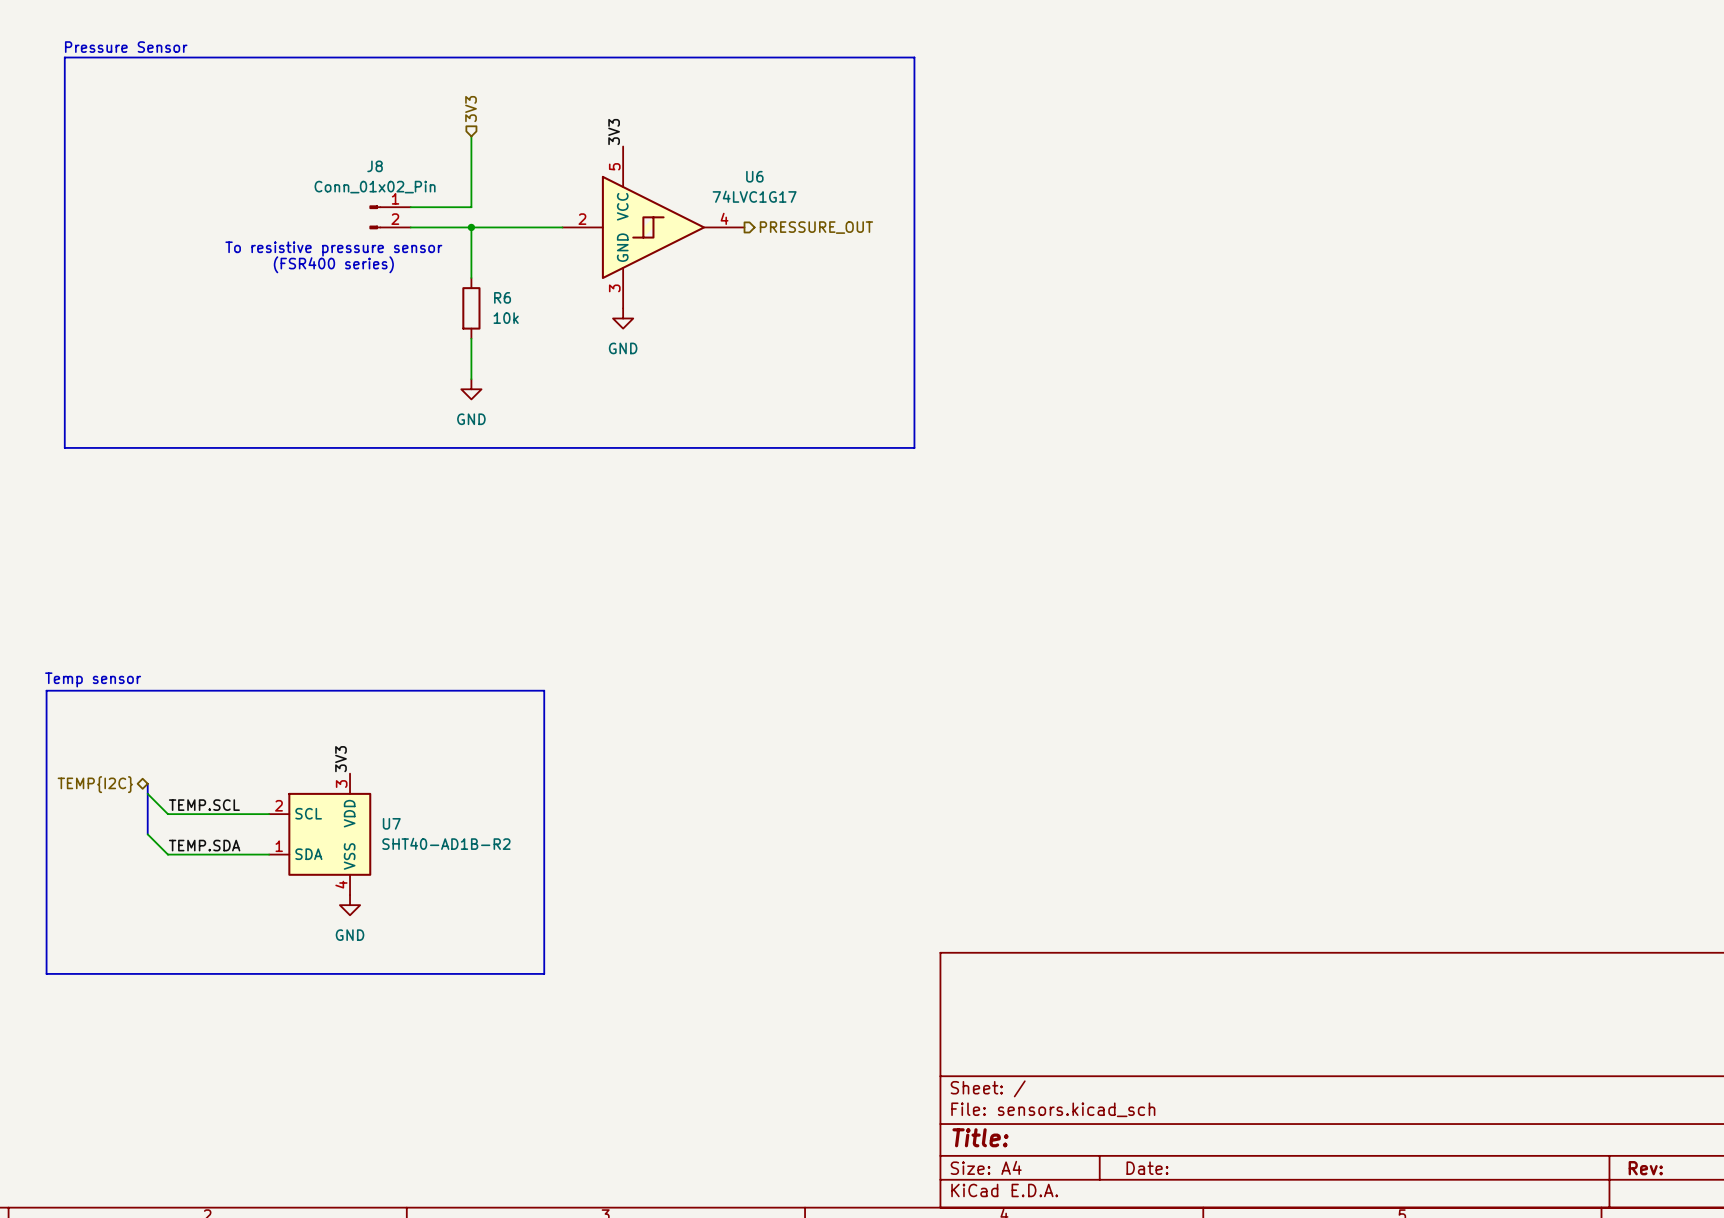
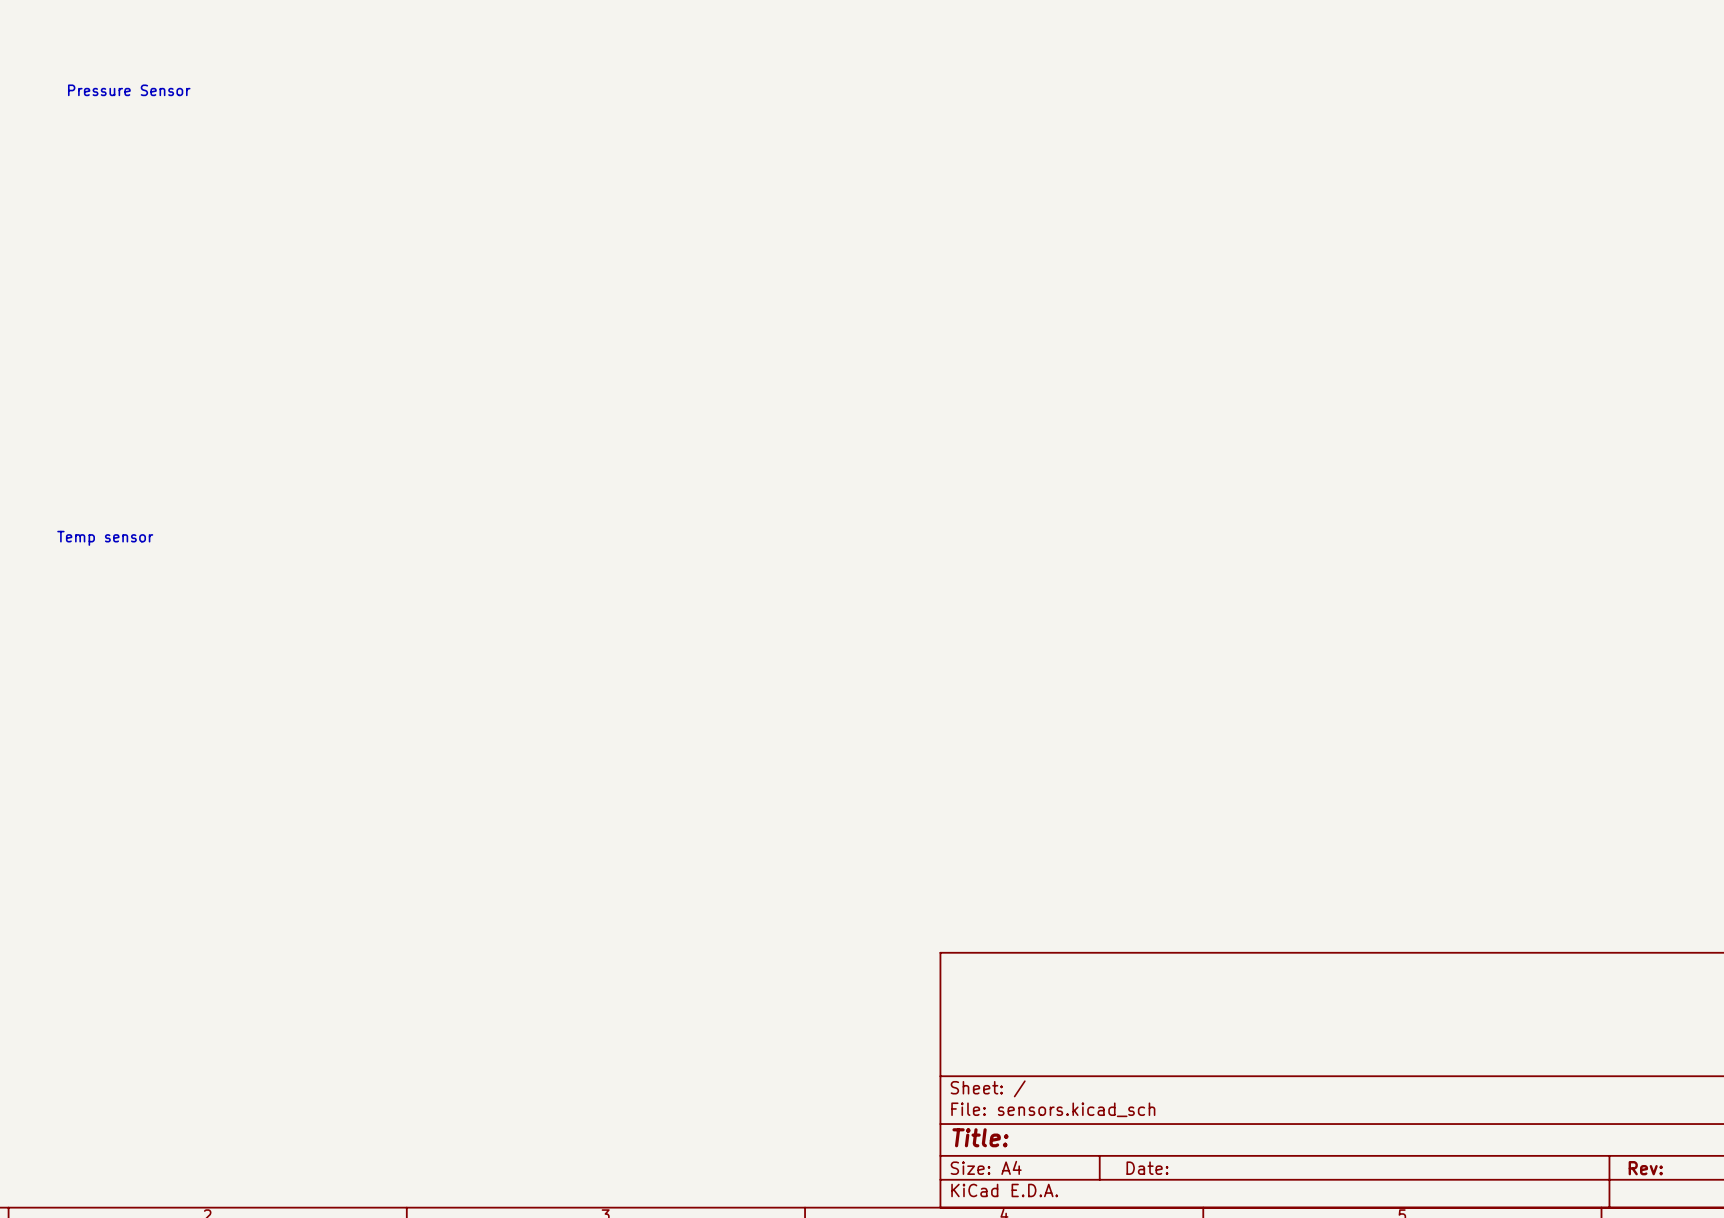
text position: Pressure Sensor (126, 47) -> Pressure Sensor (129, 90)
line: (64, 57) (914, 57) (914, 447) (64, 447) (64, 57) -> none
hierarchical label: 3V3 (471, 109) -> none
label: 3V3 (614, 132) -> none
wire: (471, 136) (471, 207) (410, 207) -> none
J8: Conn_01x02_Pin (390, 217) -> none
wire: (410, 227) (562, 227) -> none
wire: (471, 227) (471, 278) -> none
junction: (471, 227) -> none
U6: 74LVC1G17 (653, 227) -> none
hierarchical label: PRESSURE_OUT (816, 227) -> none
text: To resistive pressure sensor (333, 248) -> none
text: (FSR400 series) (333, 264) -> none
R6: 10k (471, 308) -> none
power symbol: GND (623, 318) -> none
wire: (471, 338) (471, 379) -> none
power symbol: GND (471, 389) -> none
text position: Temp sensor (93, 679) -> Temp sensor (105, 538)
line: (46, 690) (544, 690) (544, 973) (46, 973) (46, 690) -> none
label: 3V3 (341, 759) -> none
bus: (147, 783) (147, 834) -> none
hierarchical label: TEMP{I2C} (95, 784) -> none
wire: (147, 793) (167, 814) (269, 814) -> none
label: TEMP.SCL (204, 805) -> none
wire: (147, 834) (167, 854) (269, 854) -> none
U7: SHT40-AD1B-R2 (320, 834) -> none
label: TEMP.SDA (204, 845) -> none
power symbol: GND (350, 905) -> none

